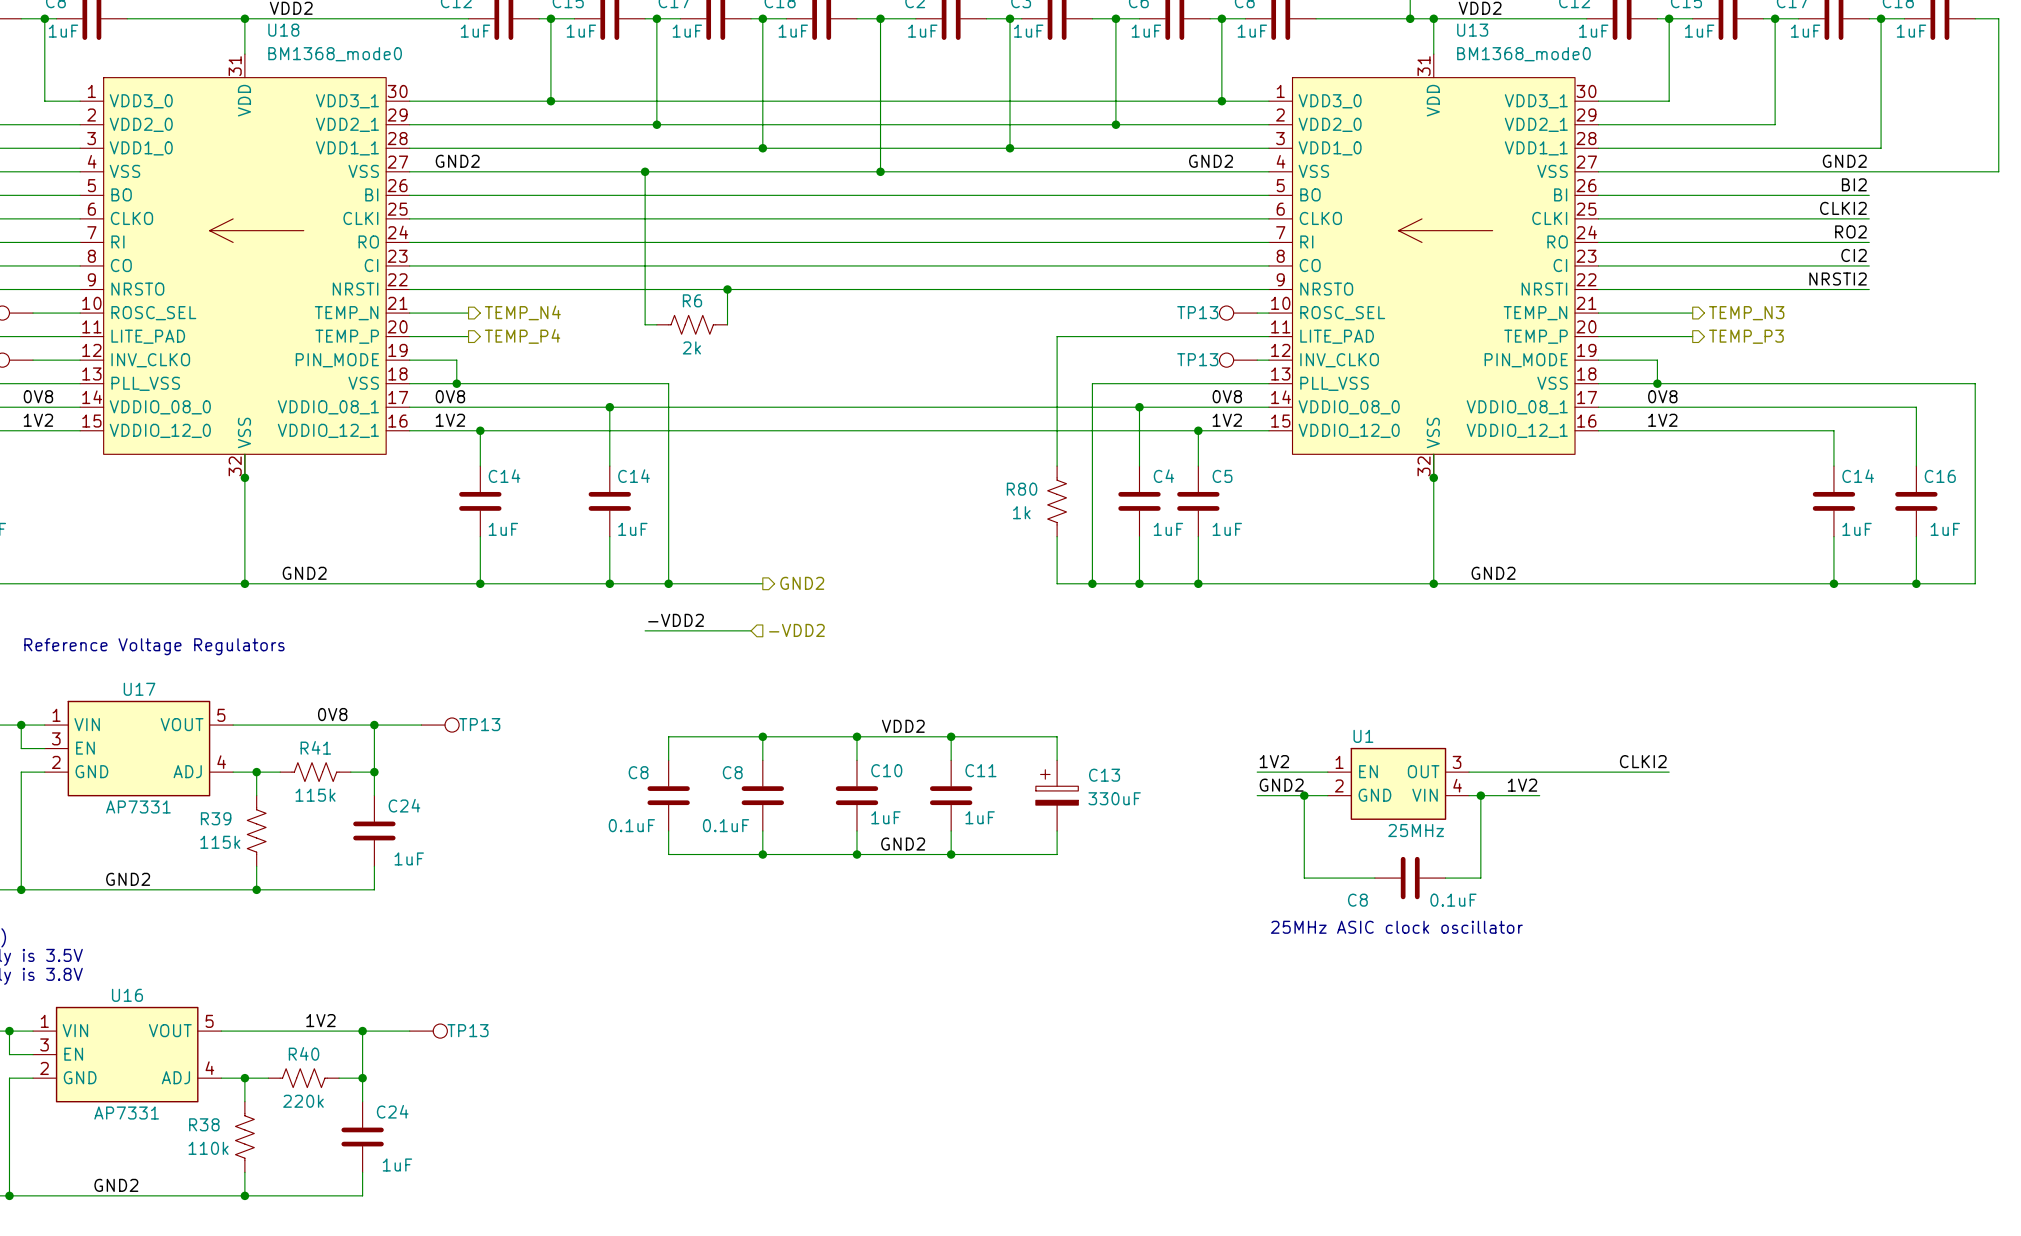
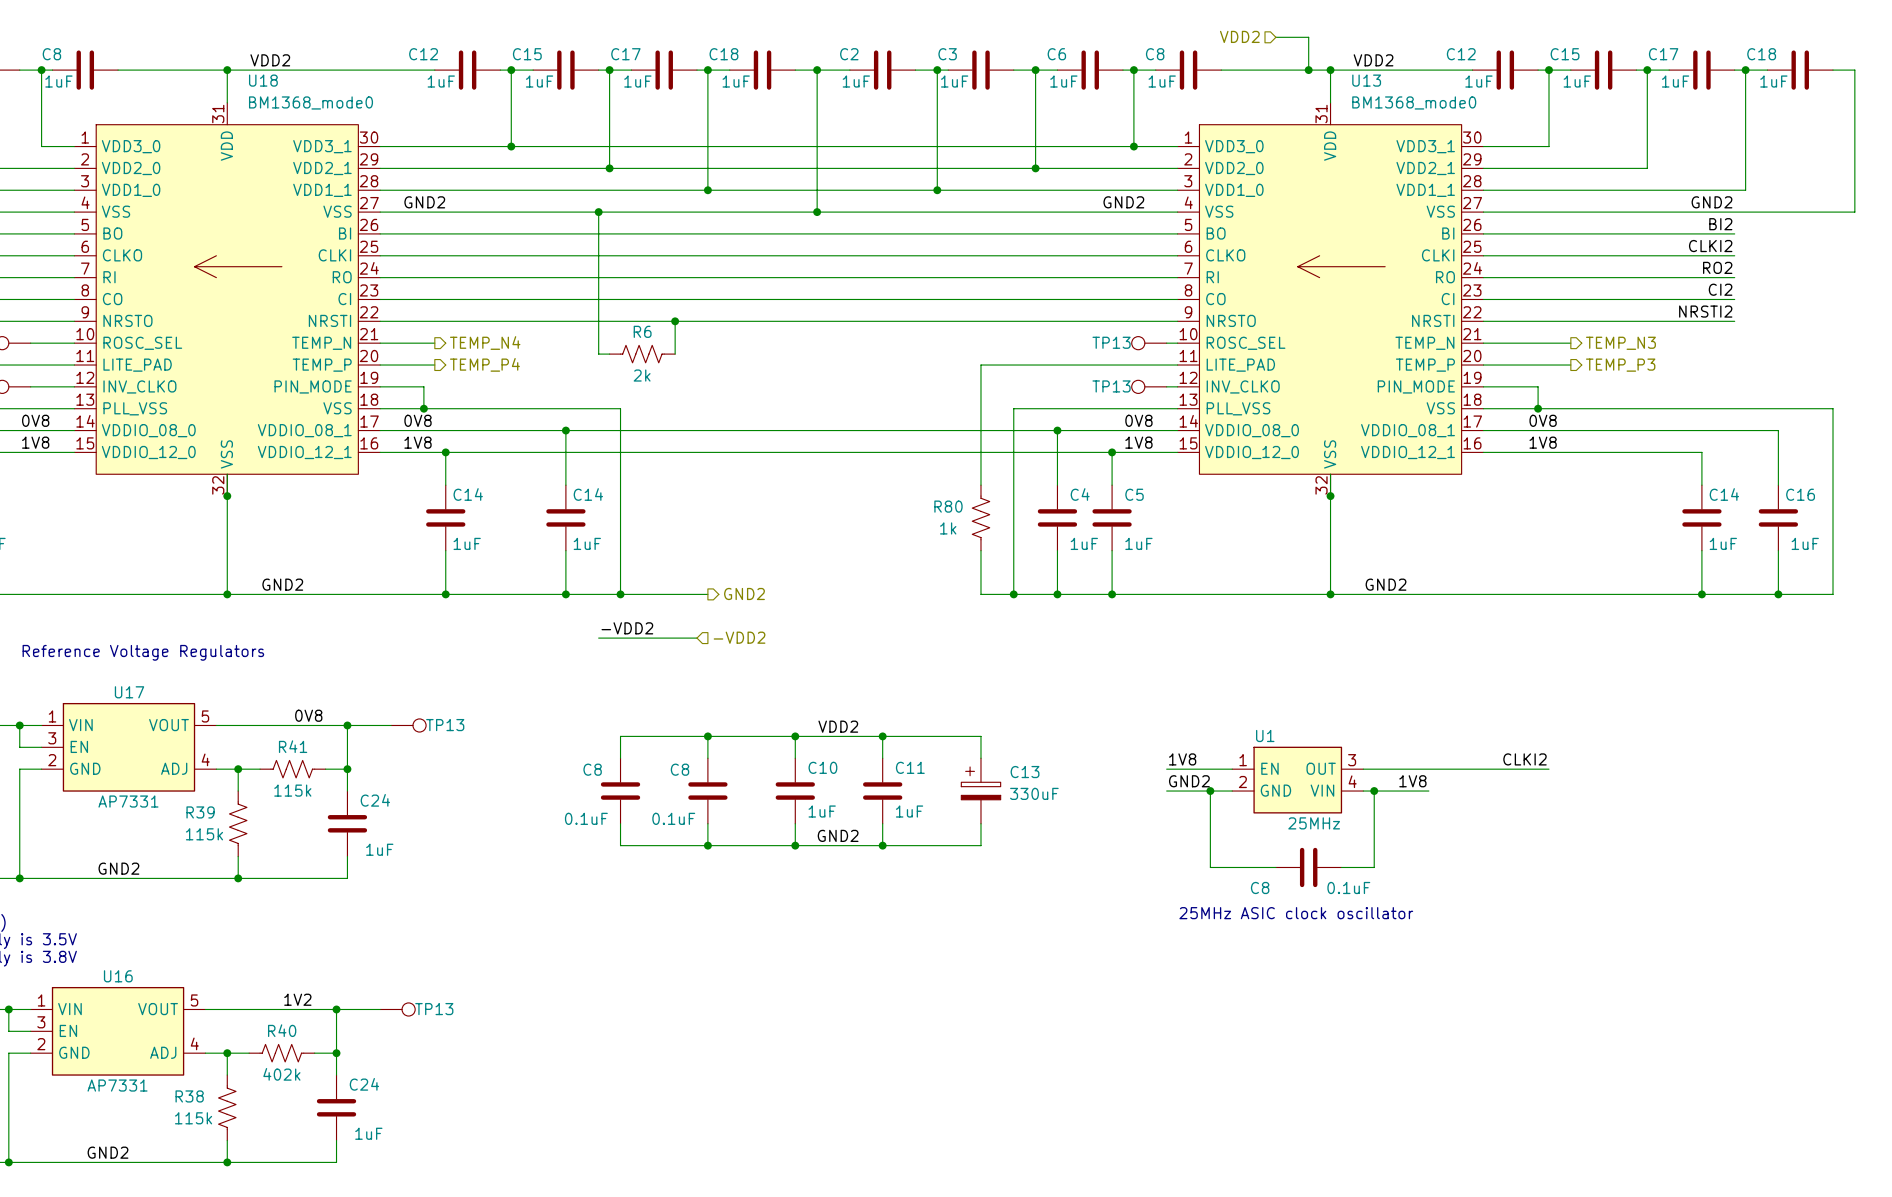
label: 1V2 (38, 420) -> 1V8 (35, 442)
label: 1V2 (450, 420) -> 1V8 (418, 442)
label: 1V2 (1227, 420) -> 1V8 (1138, 442)
label: 1V2 (1662, 420) -> 1V8 (1543, 442)
label: 1V2 (1274, 761) -> 1V8 (1182, 759)
label: 1V2 (1522, 785) -> 1V8 (1412, 781)
R40 value: 220k (303, 1101) -> 402k (281, 1074)
R38 value: 110k (208, 1148) -> 115k (193, 1118)

